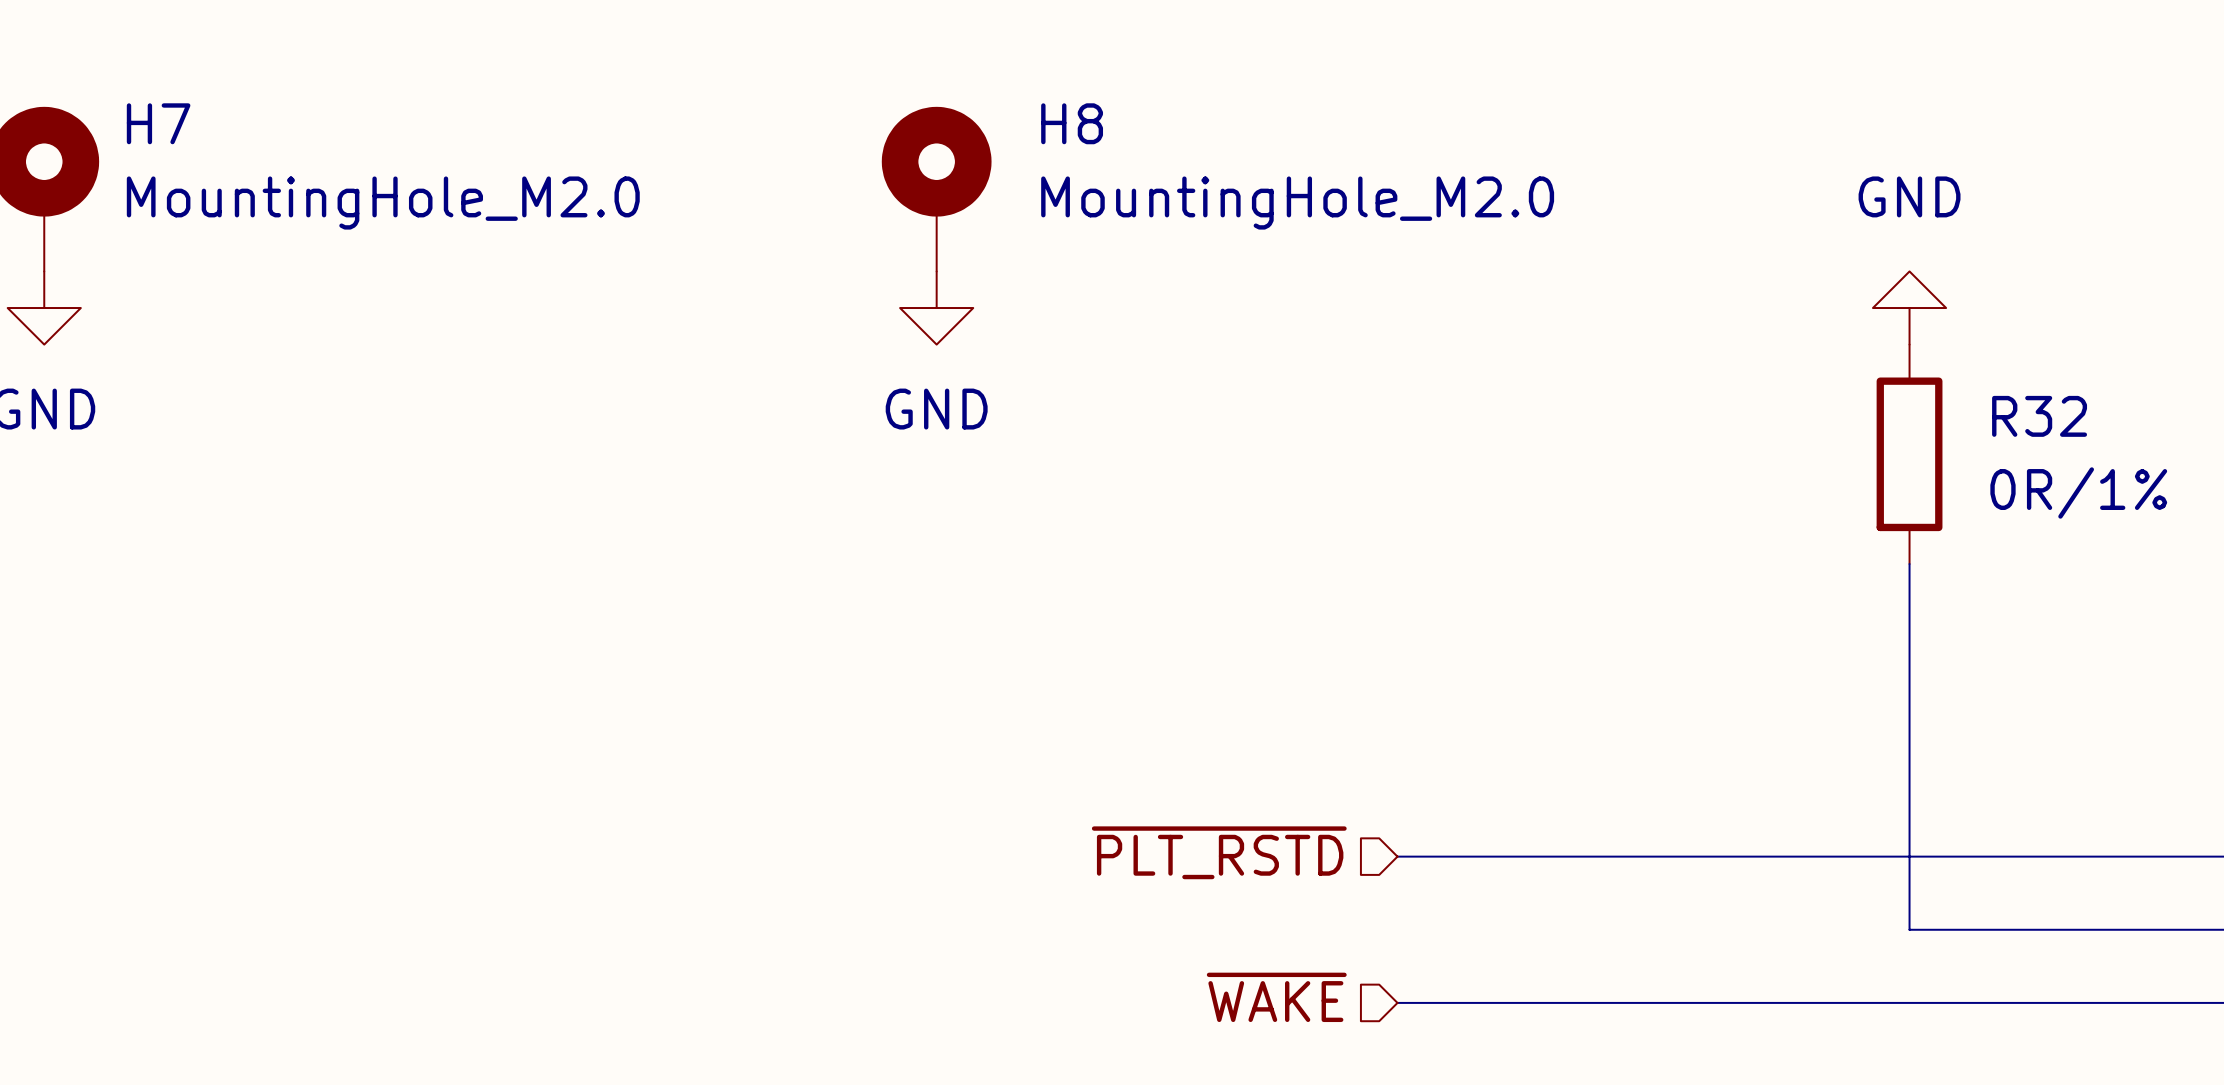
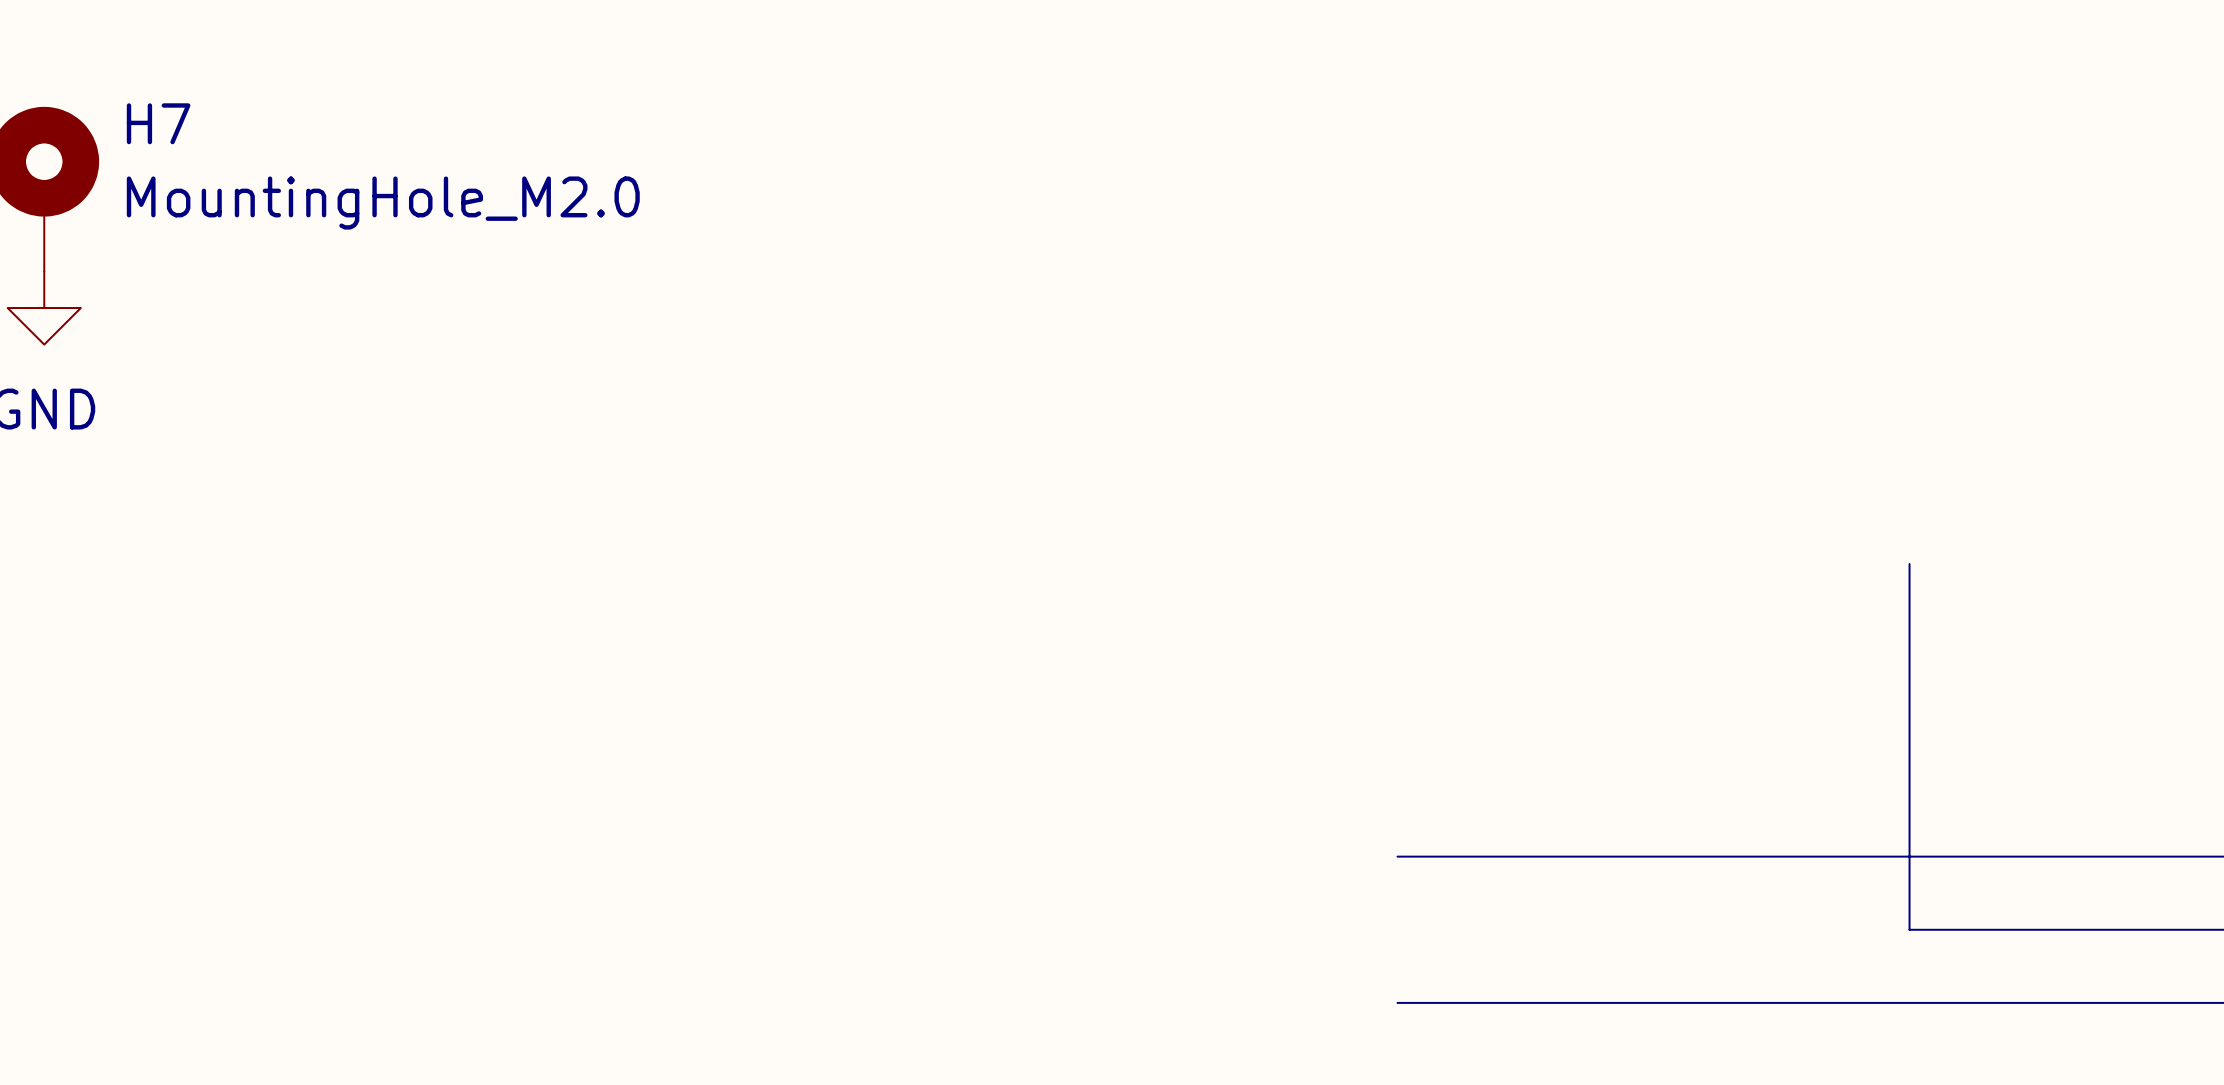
H8: MountingHole_M2.0 (936, 189) -> none
power symbol: GND (936, 308) -> none
power symbol: GND (1909, 308) -> none
R32: 0R/1% (1909, 454) -> none
hierarchical label: ~{PLT_RSTD} (1219, 852) -> none
hierarchical label: ~{WAKE} (1276, 997) -> none

